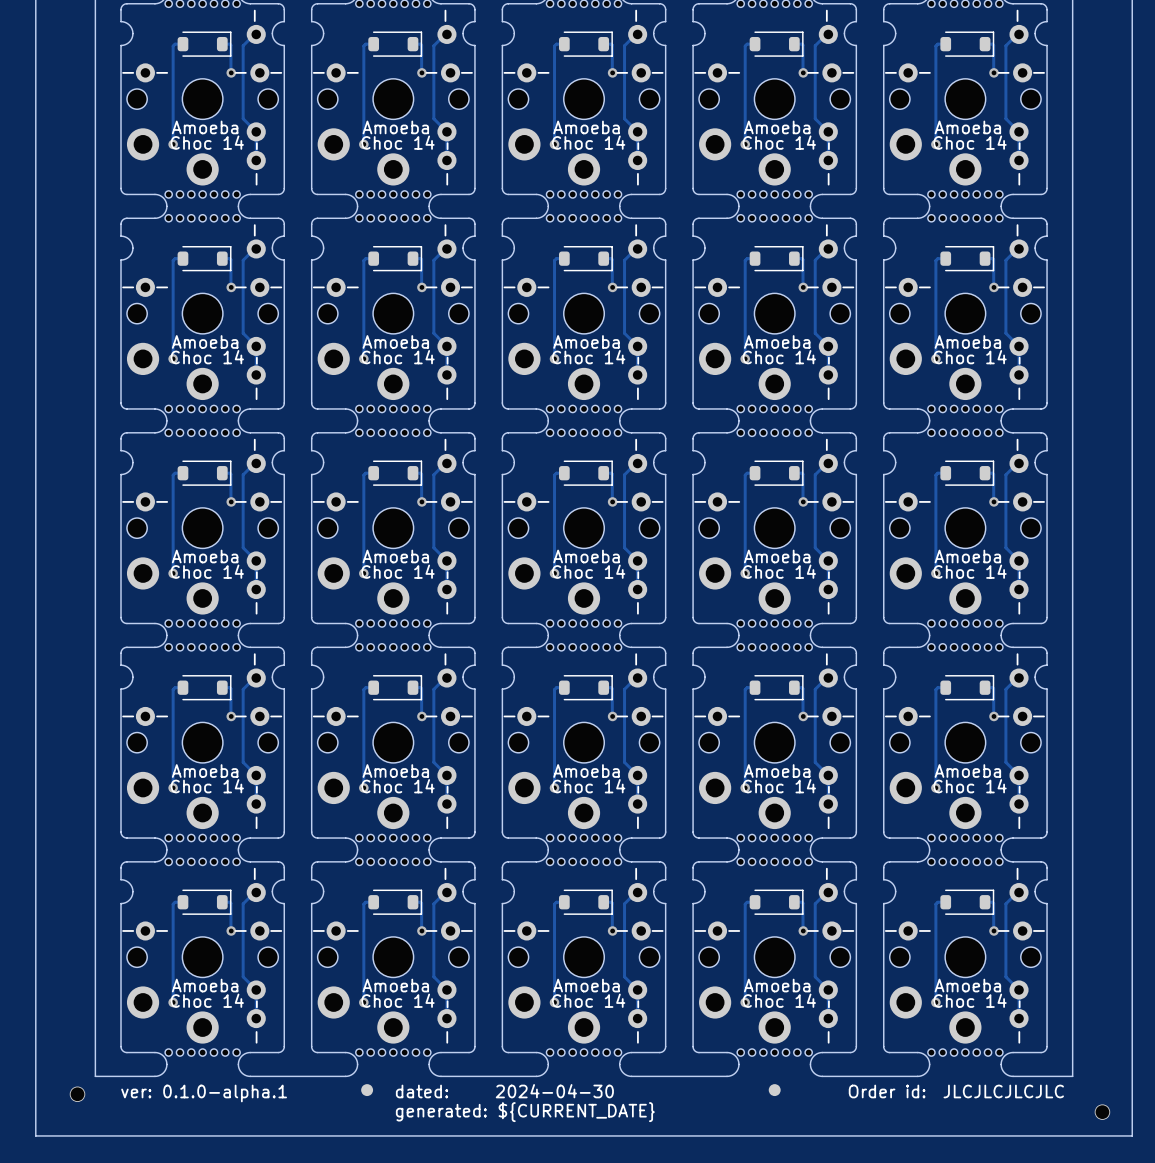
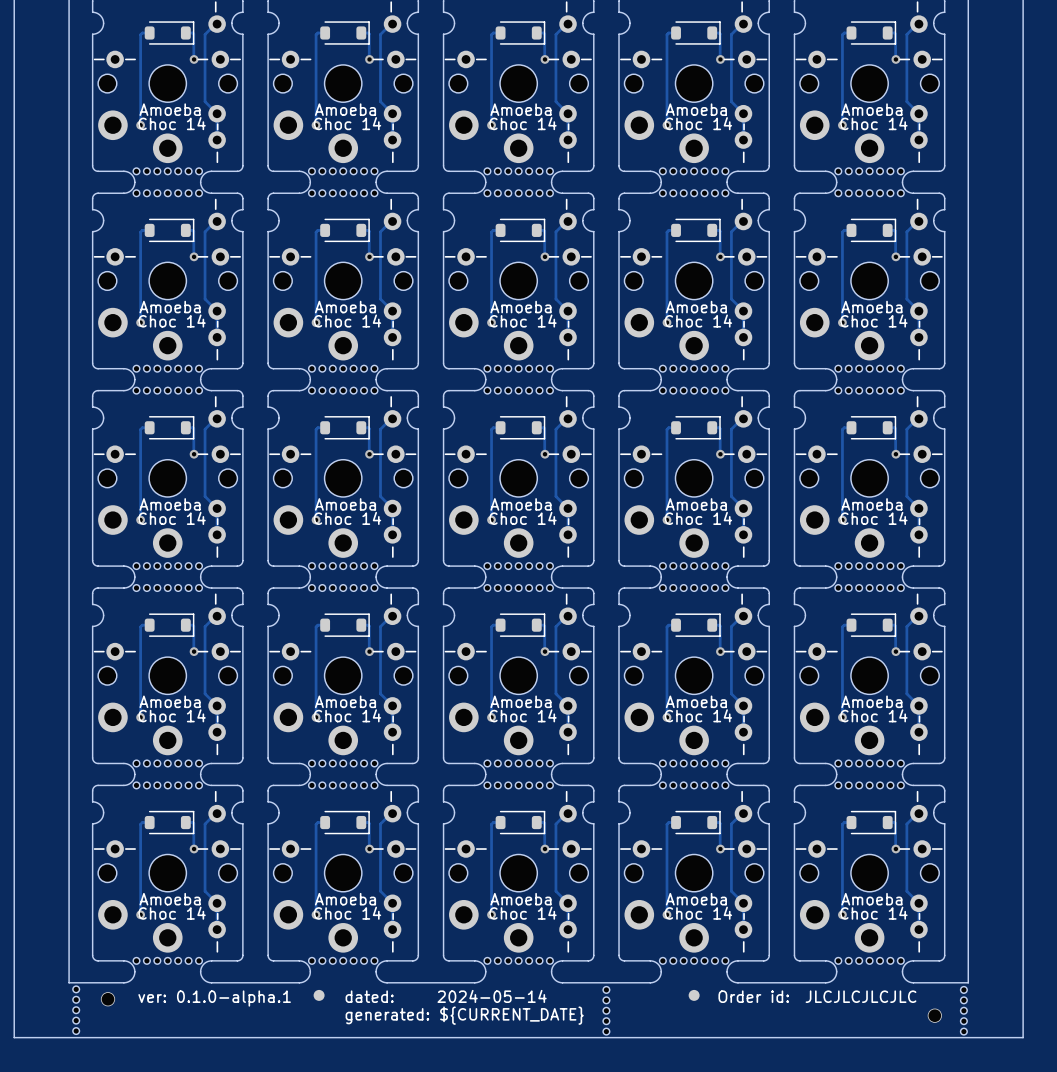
text: dated: 2024-04-30 (504, 1091) -> dated: 2024-05-14 (446, 996)
text position: Order id: (887, 1091) -> Order id: (753, 996)
text position: JLCJLCJLCJLC (1003, 1091) -> JLCJLCJLCJLC (861, 996)
text position: ver: 0.1.0-alpha.1 (204, 1093) -> ver: 0.1.0-alpha.1 (214, 998)
part position: (77, 1094) -> (107, 999)
part: none -> (76, 1010)
part: none -> (606, 1010)
part: none -> (963, 1010)
part position: (1102, 1112) -> (934, 1015)

